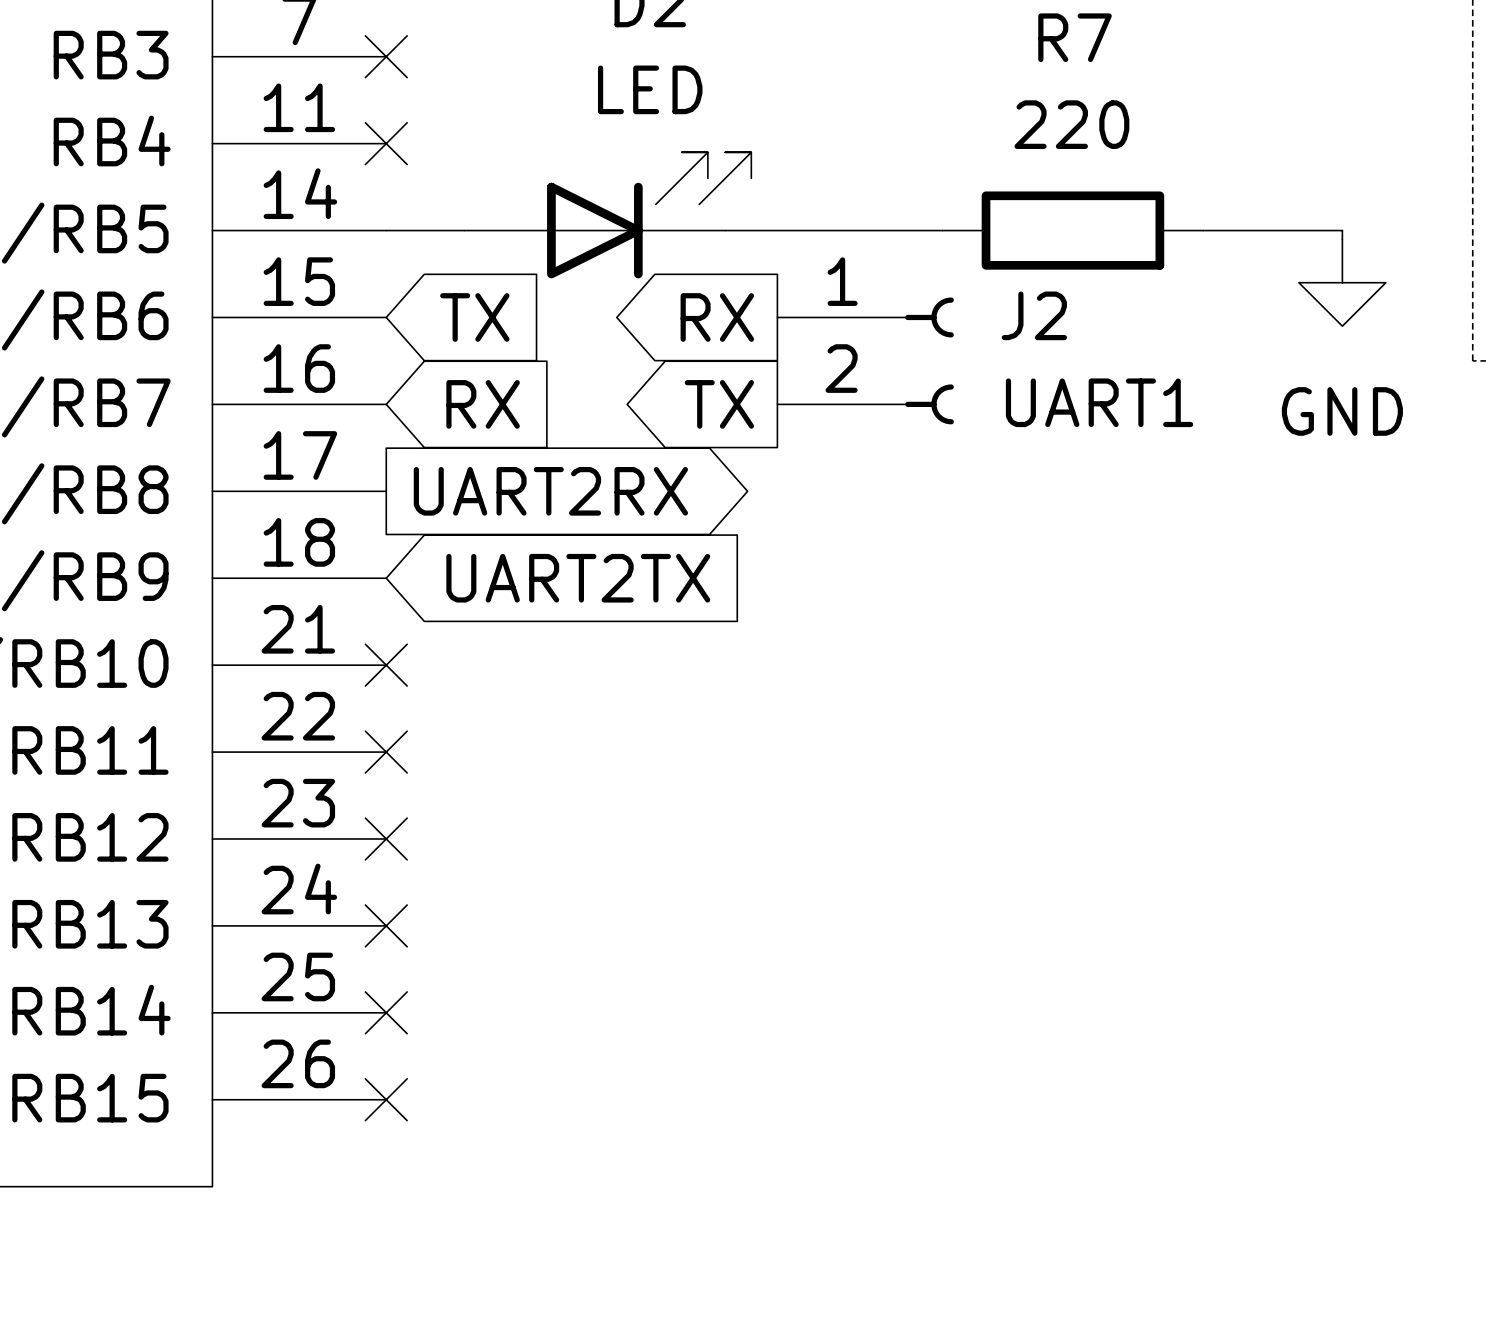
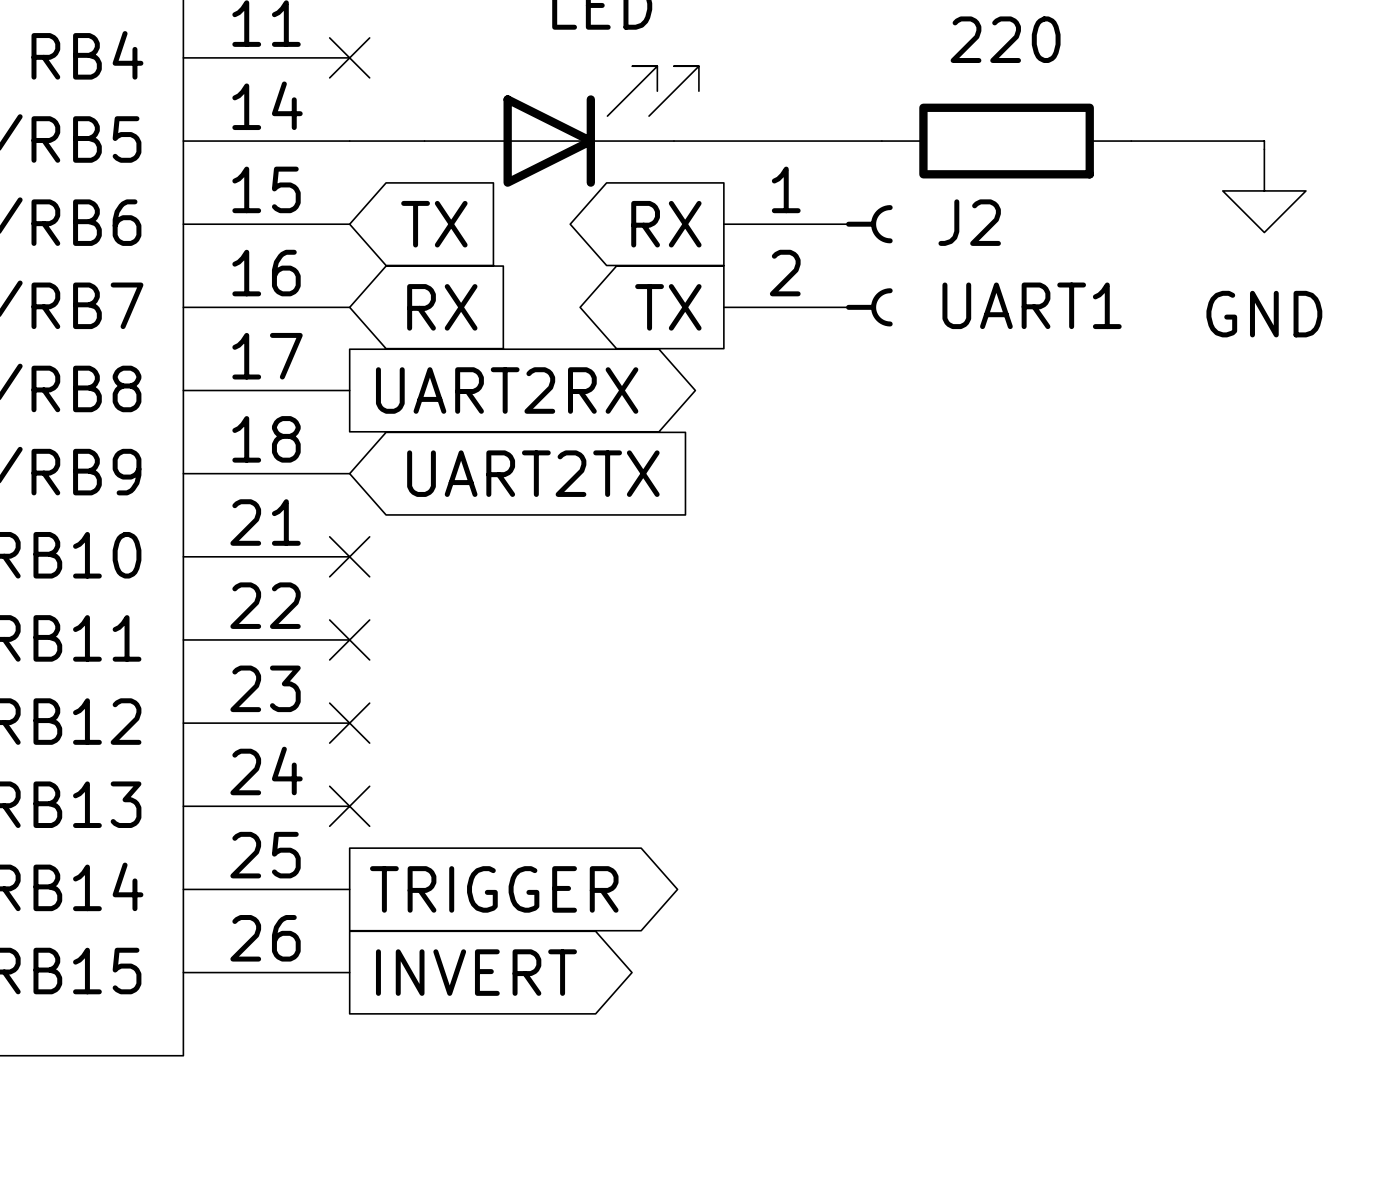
no-connect mark: (386, 1012) -> none
global label: none -> TRIGGER (494, 889)
no-connect mark: (386, 1099) -> none
global label: none -> INVERT (476, 972)

